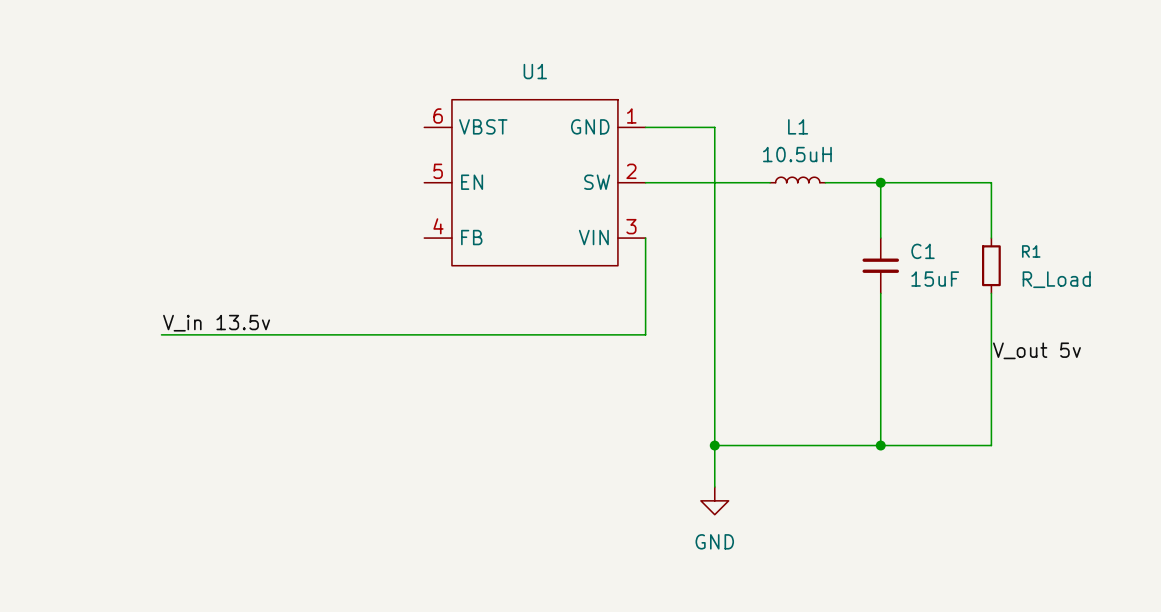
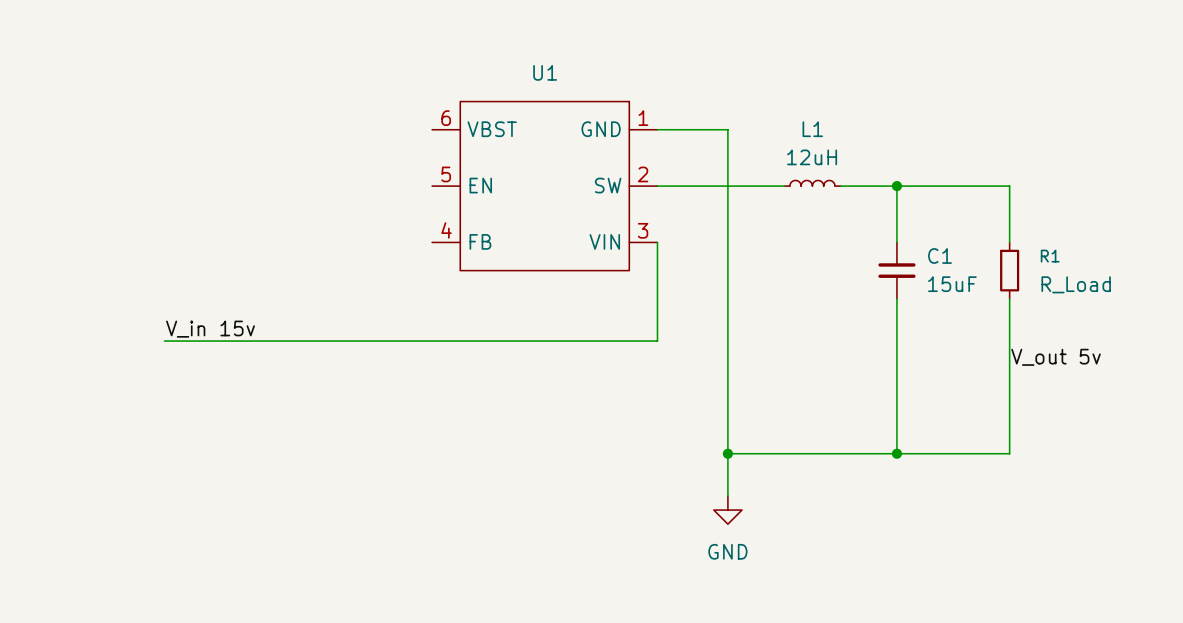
L1 value: 10.5uH (797, 154) -> 12uH (812, 157)
label: V_in 13.5v (216, 323) -> V_in 15v (210, 329)

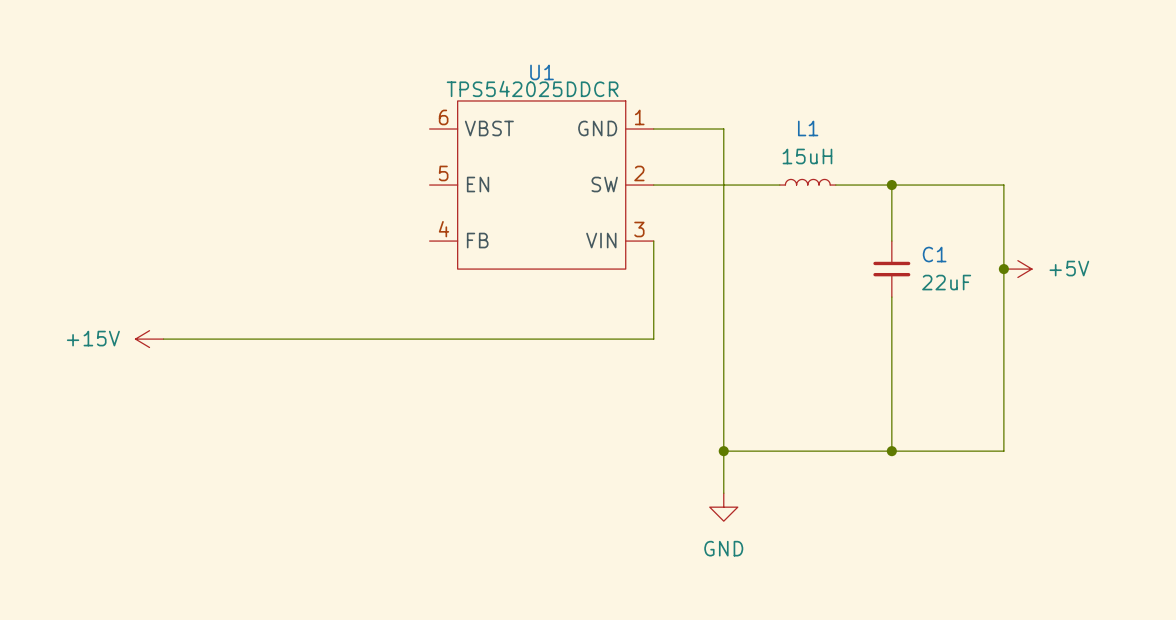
U1 value: none -> TPS542025DDCR (532, 88)
L1 value: 12uH (812, 157) -> 15uH (807, 156)
wire: none -> (1003, 241) (1003, 297)
R1: R_Load (1009, 270) -> none
junction: none -> (1003, 269)
power symbol: none -> +5V (1017, 269)
C1 value: 15uF (952, 284) -> 22uF (946, 282)
label: V_in 15v (210, 329) -> none
power symbol: none -> +15V (149, 339)
label: V_out 5v (1056, 357) -> none

